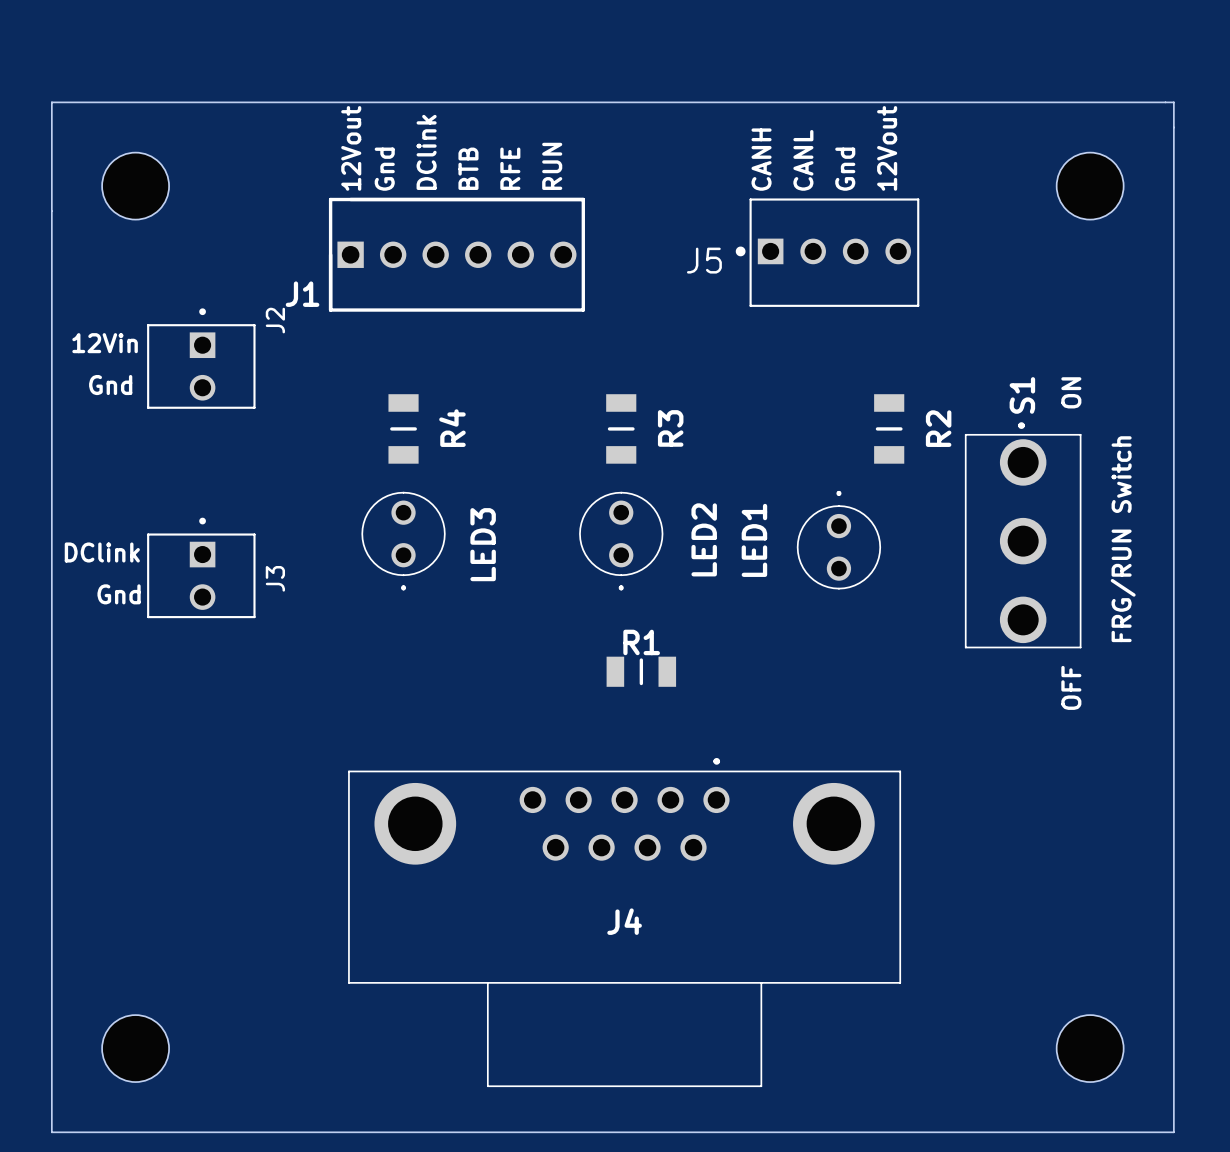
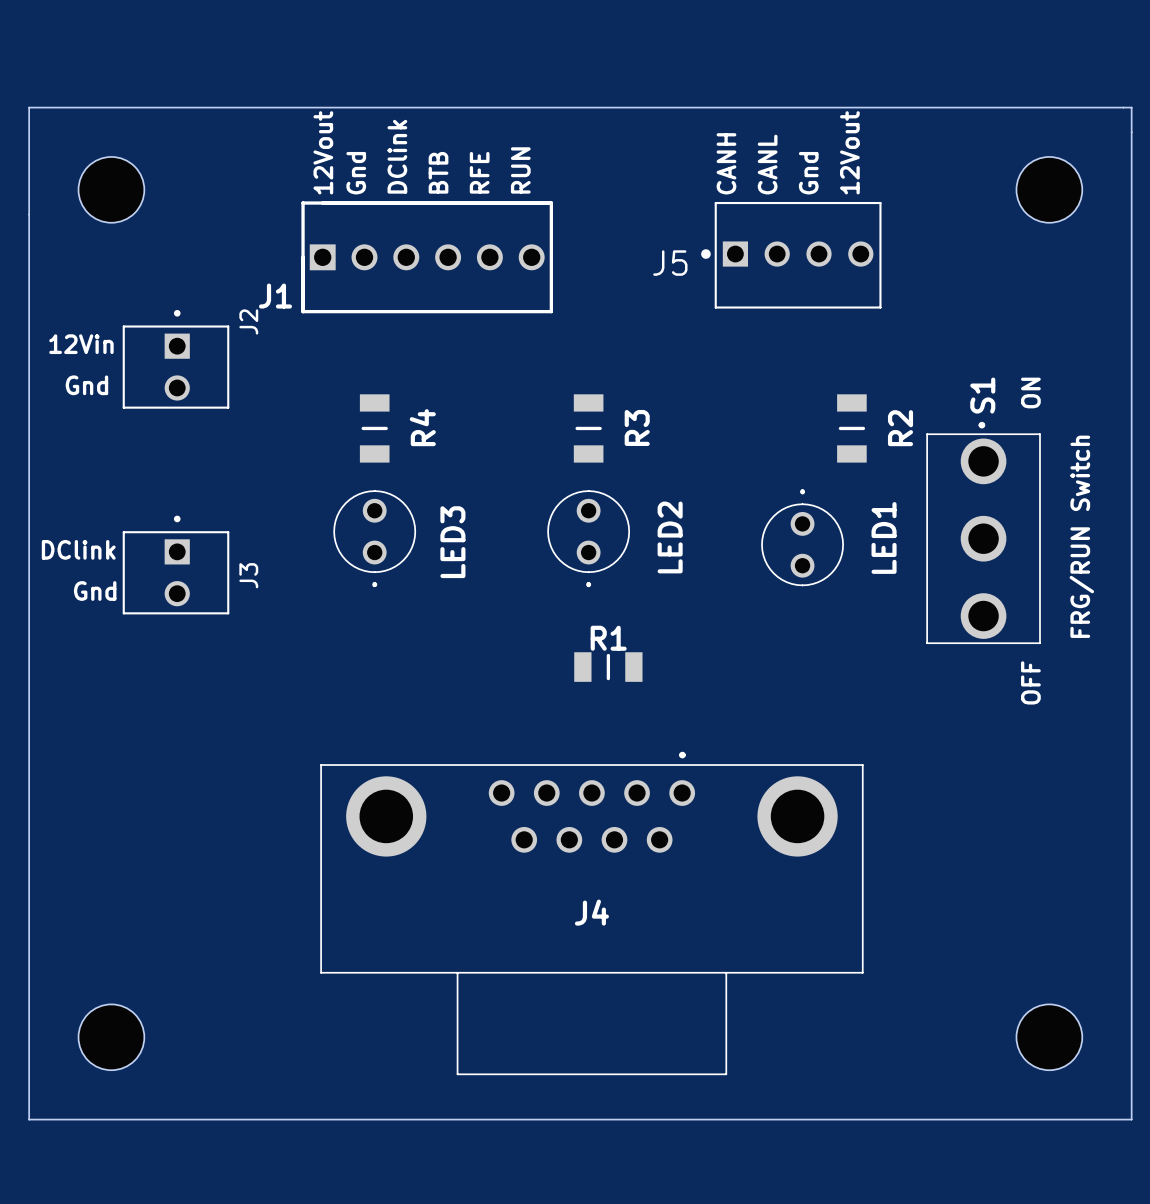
LED1 name position: LED1 (754, 540) -> LED1 (884, 537)

